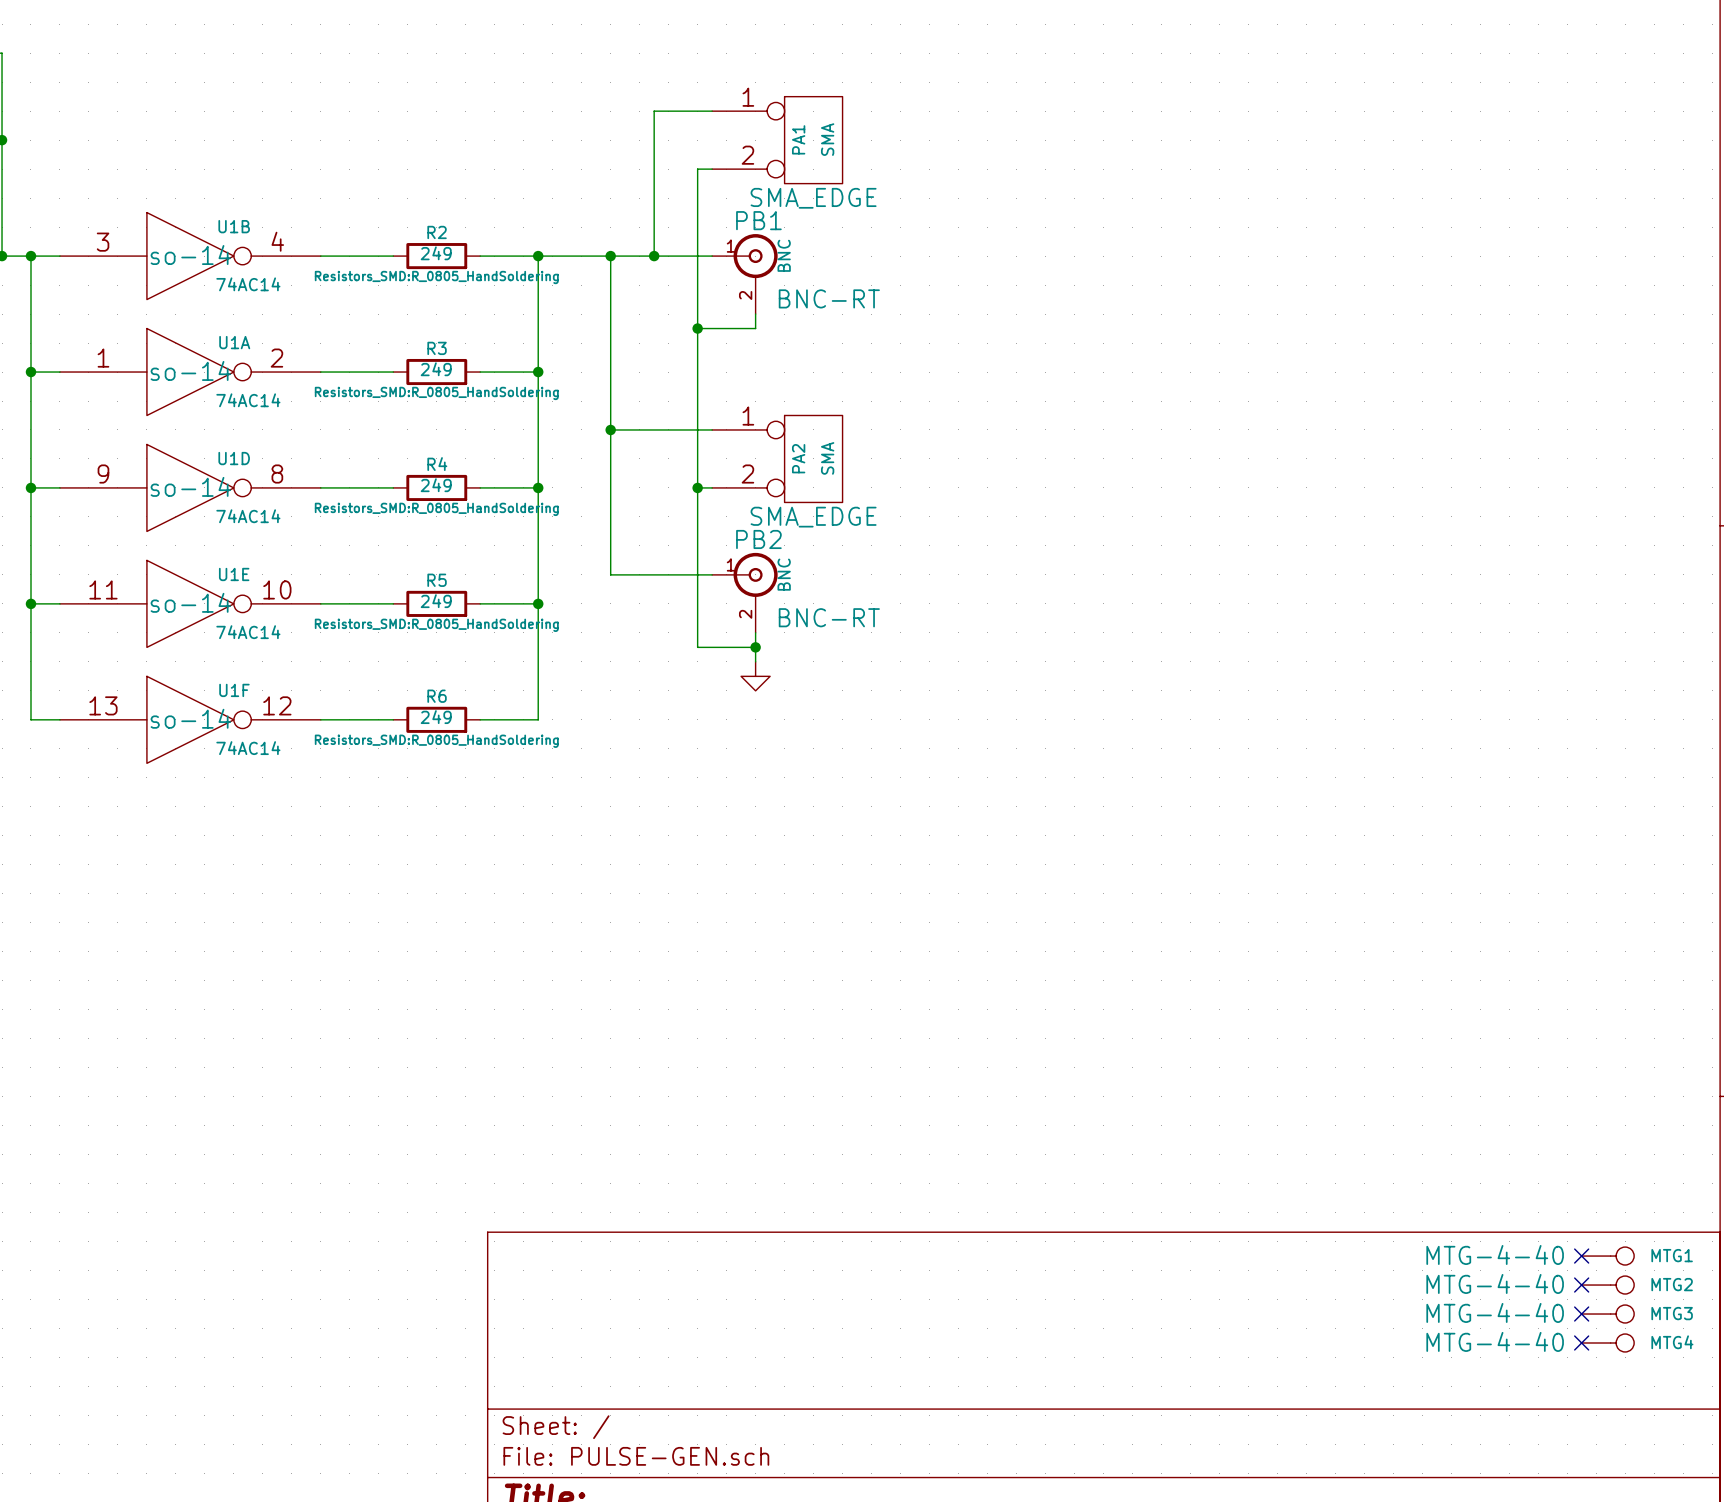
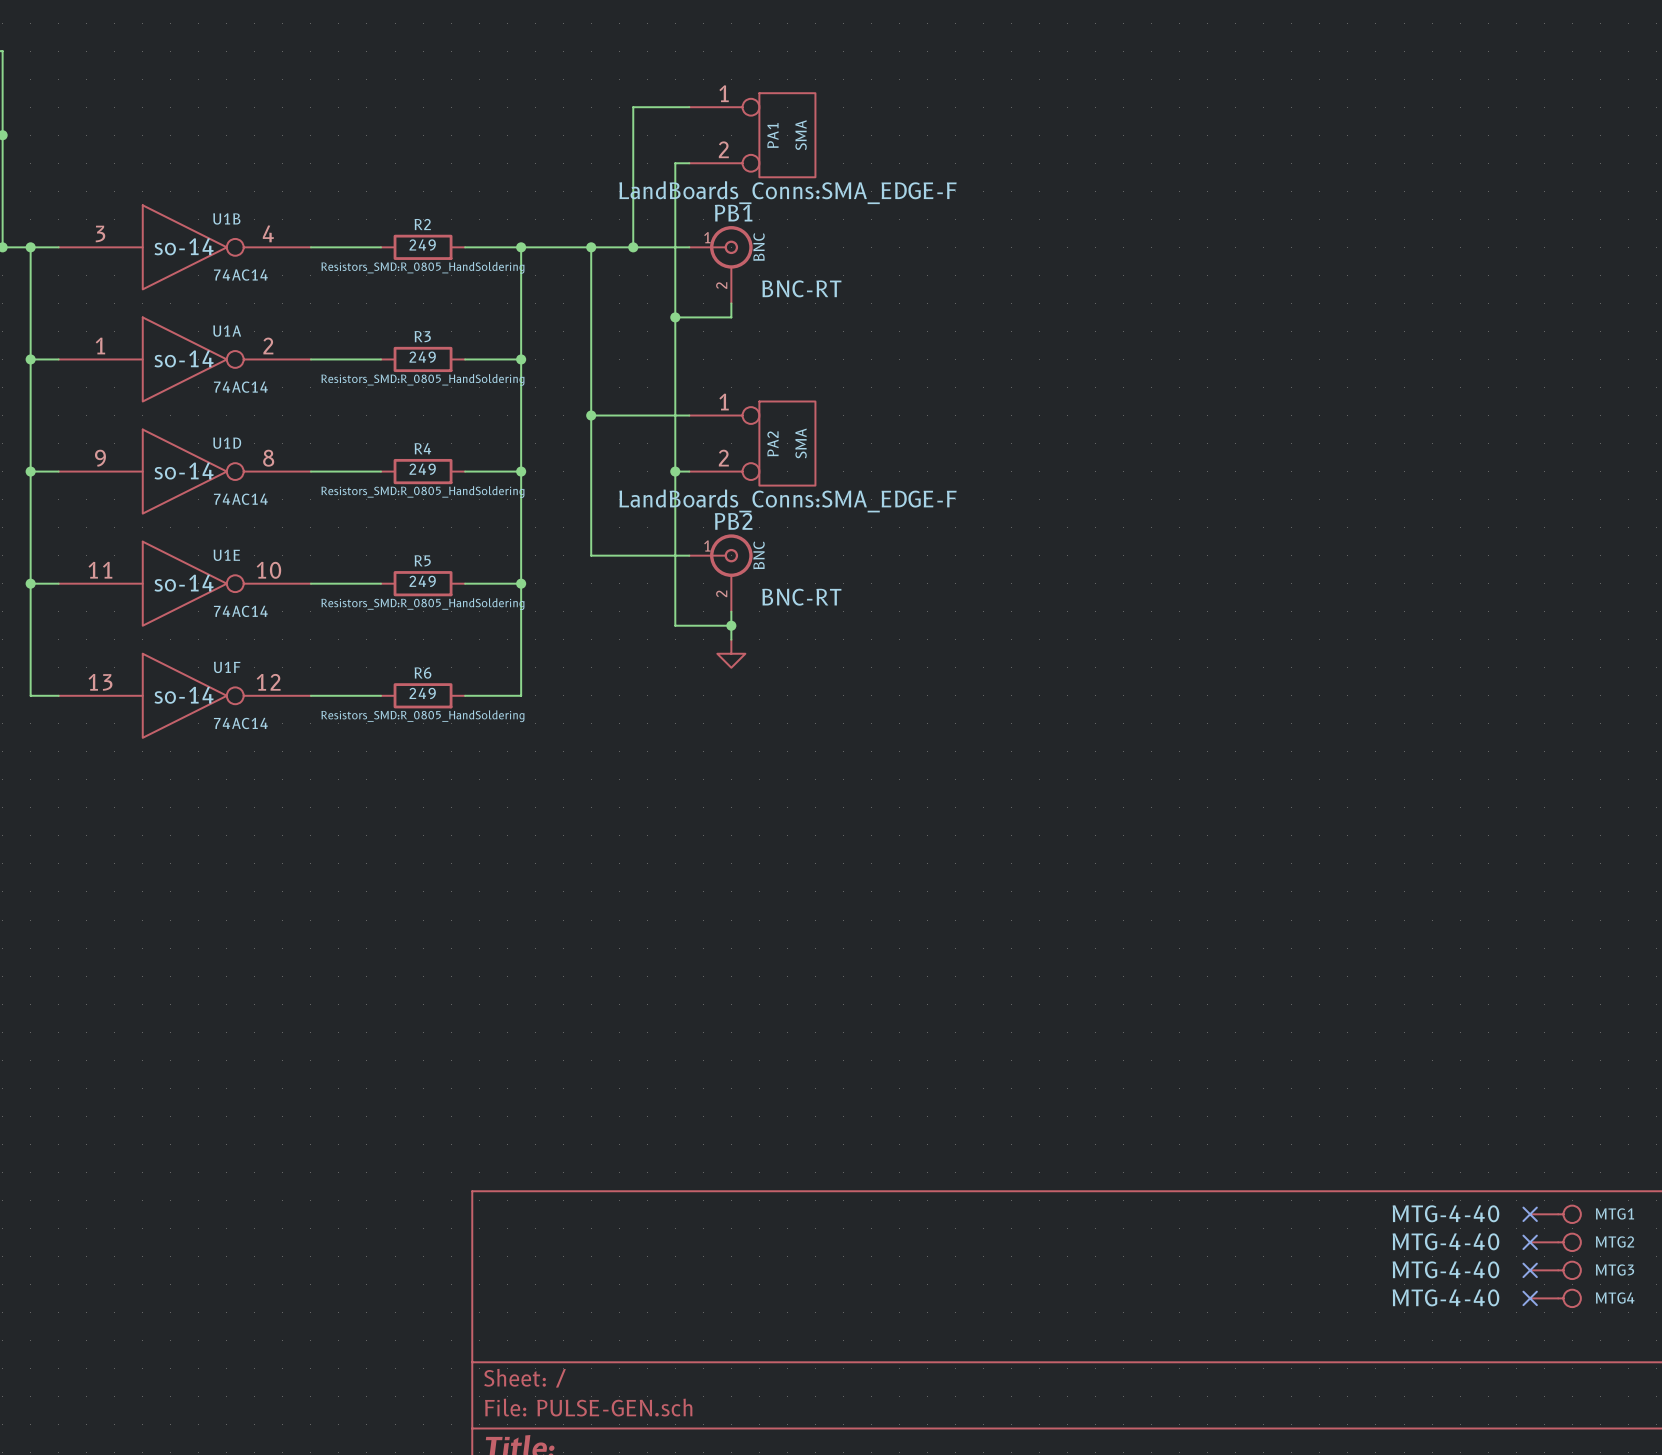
PA1 text: SMA_EDGE (813, 198) -> LandBoards_Conns:SMA_EDGE-F (787, 192)
PA2 text: SMA_EDGE (813, 517) -> LandBoards_Conns:SMA_EDGE-F (787, 500)

